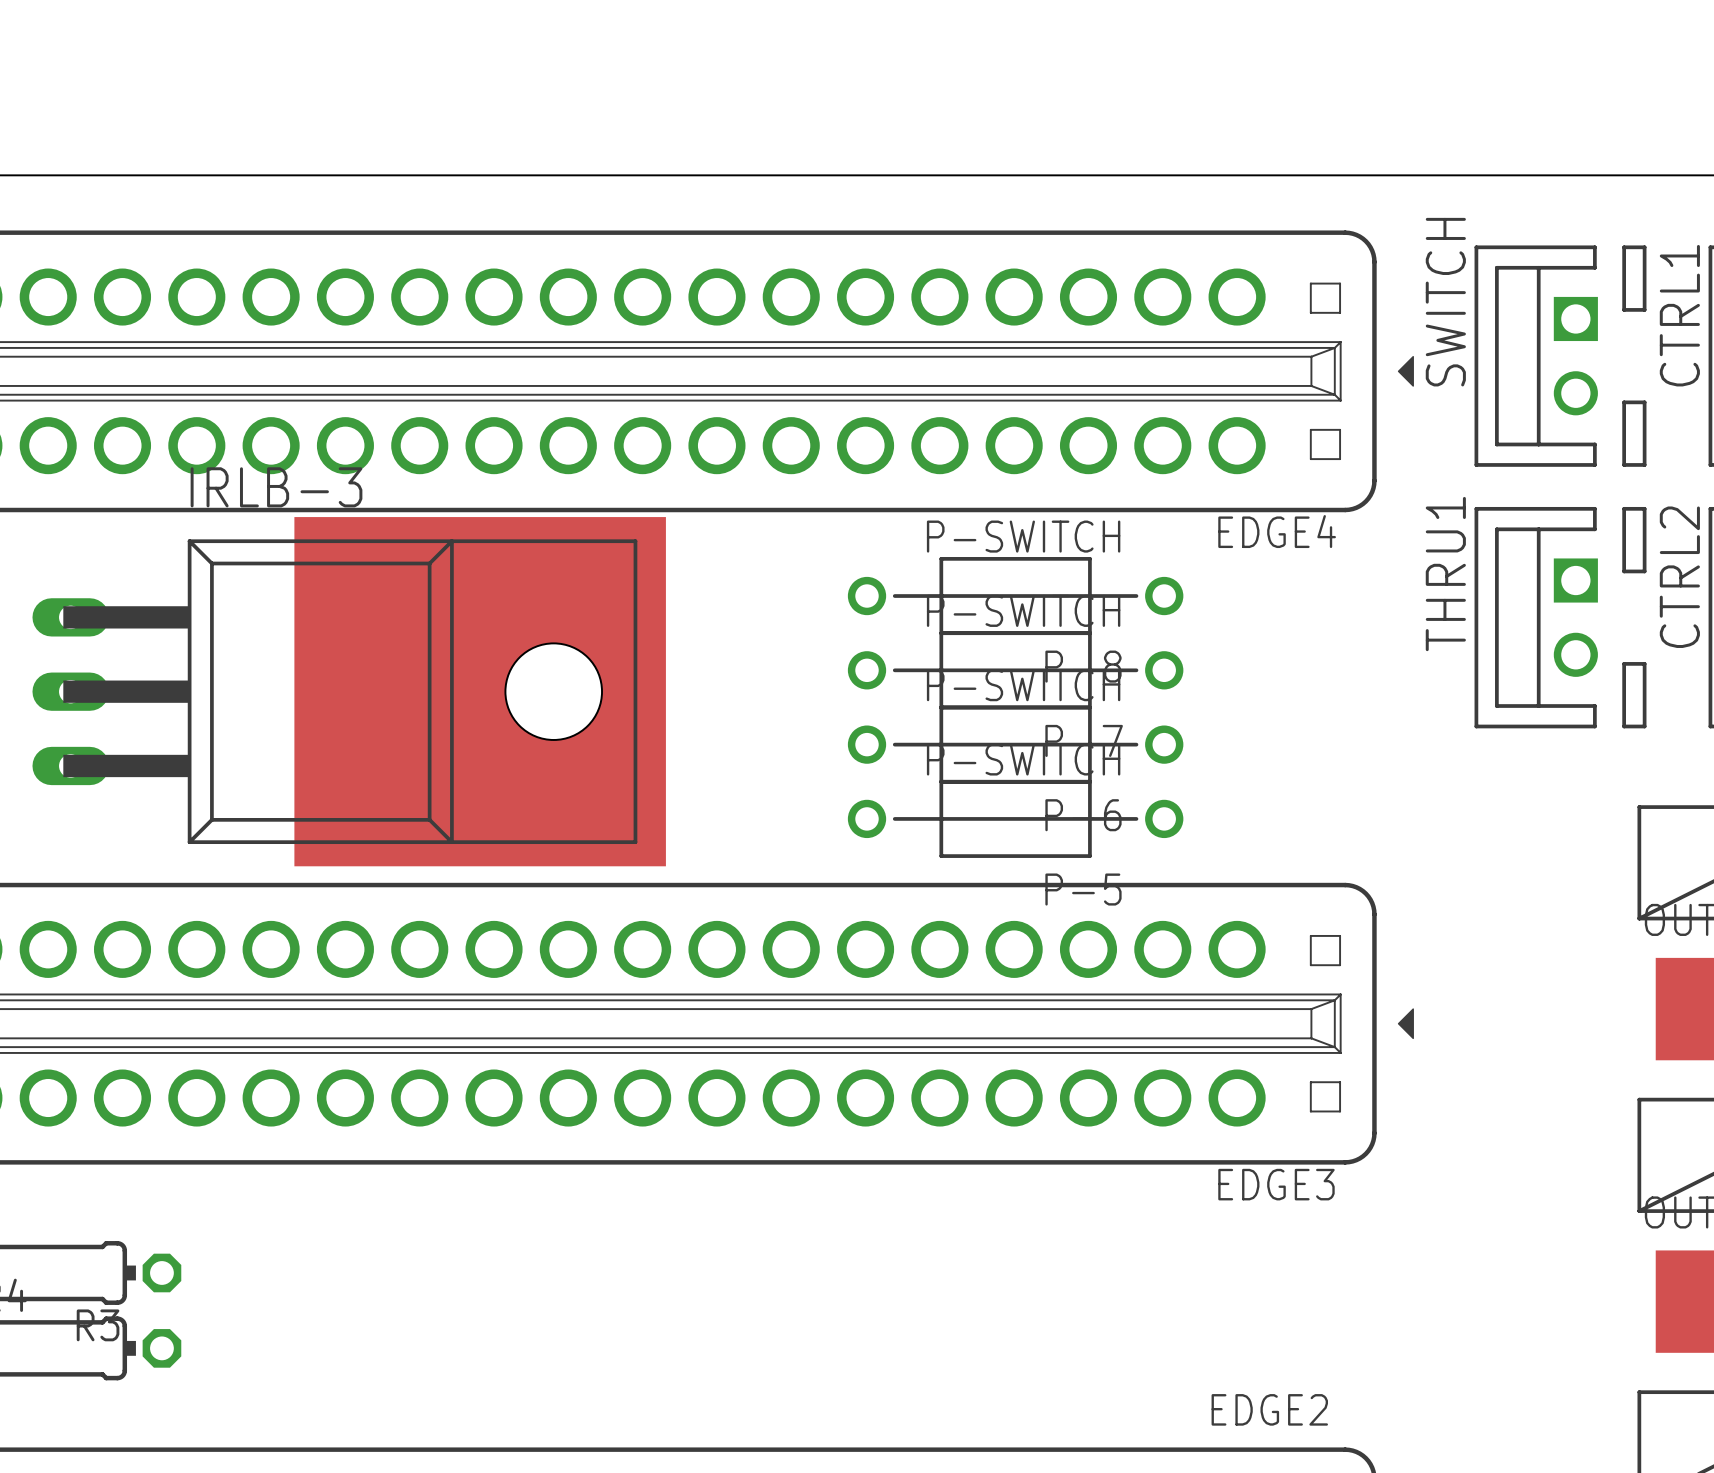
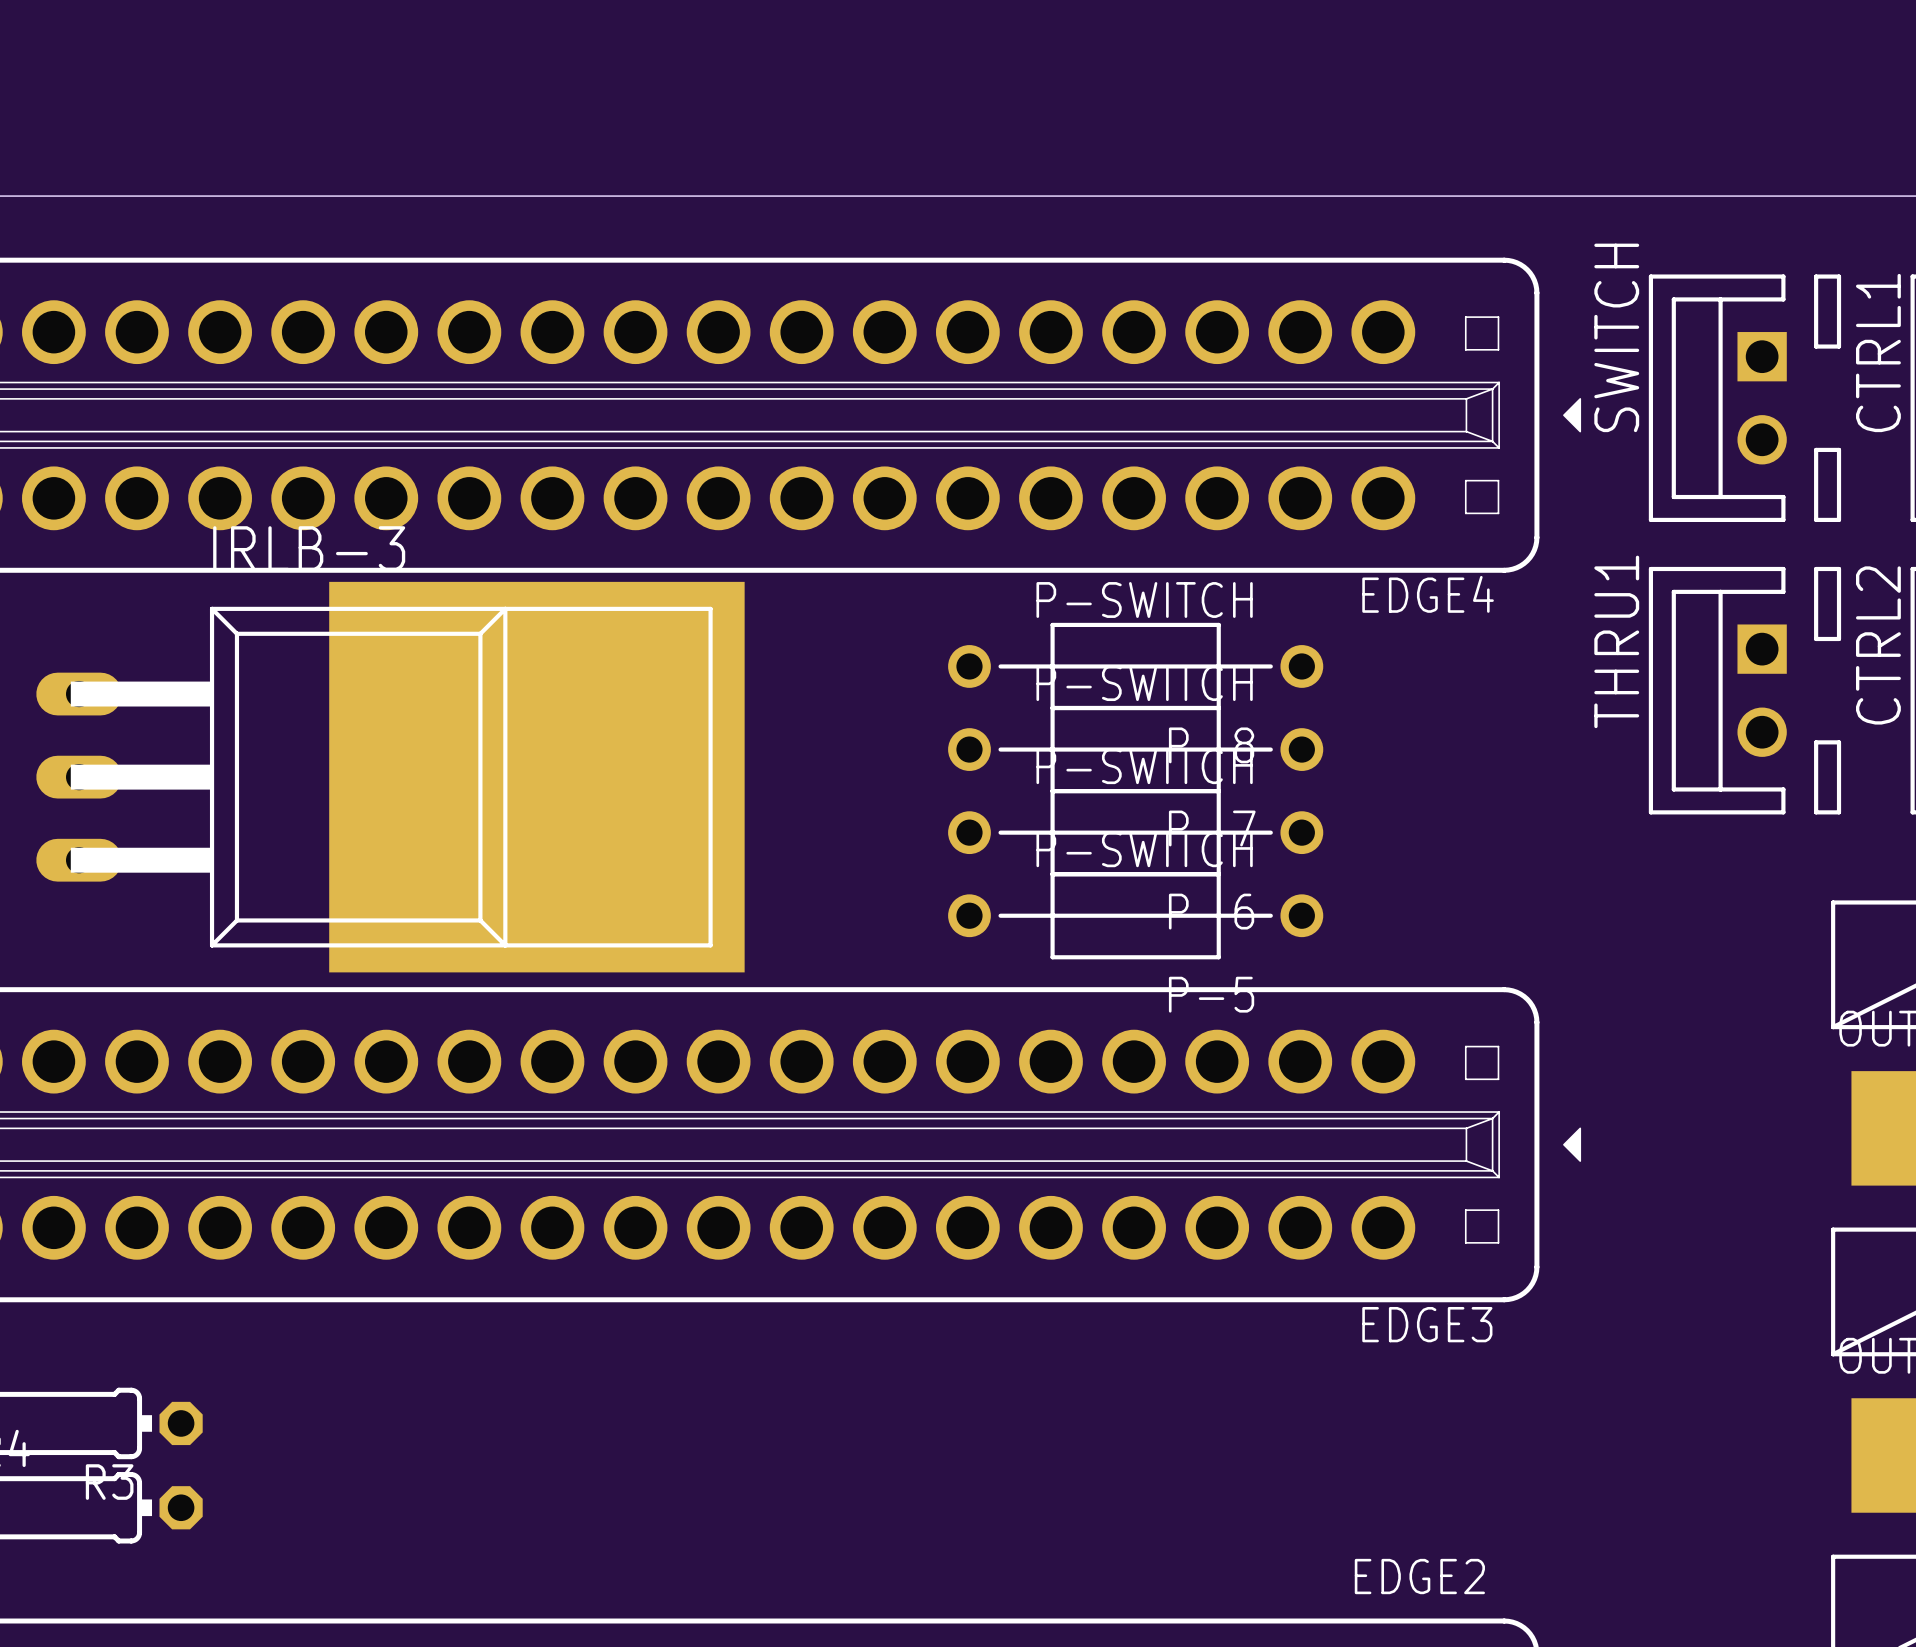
IRLB-3 footprint: [32, 517, 666, 867] -> [36, 581, 745, 973]

